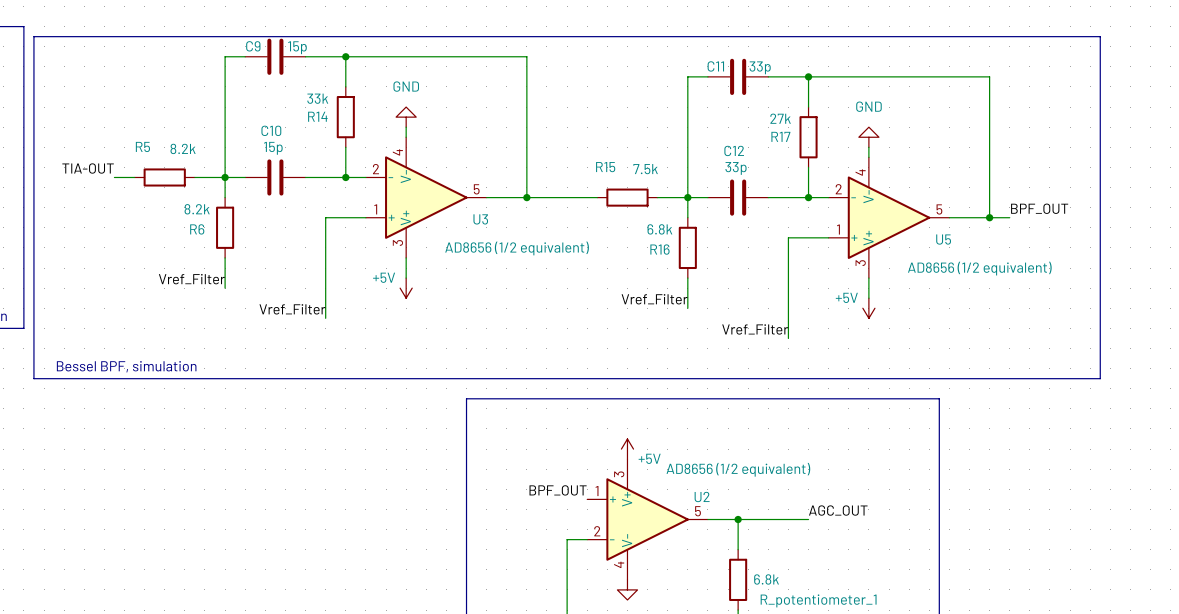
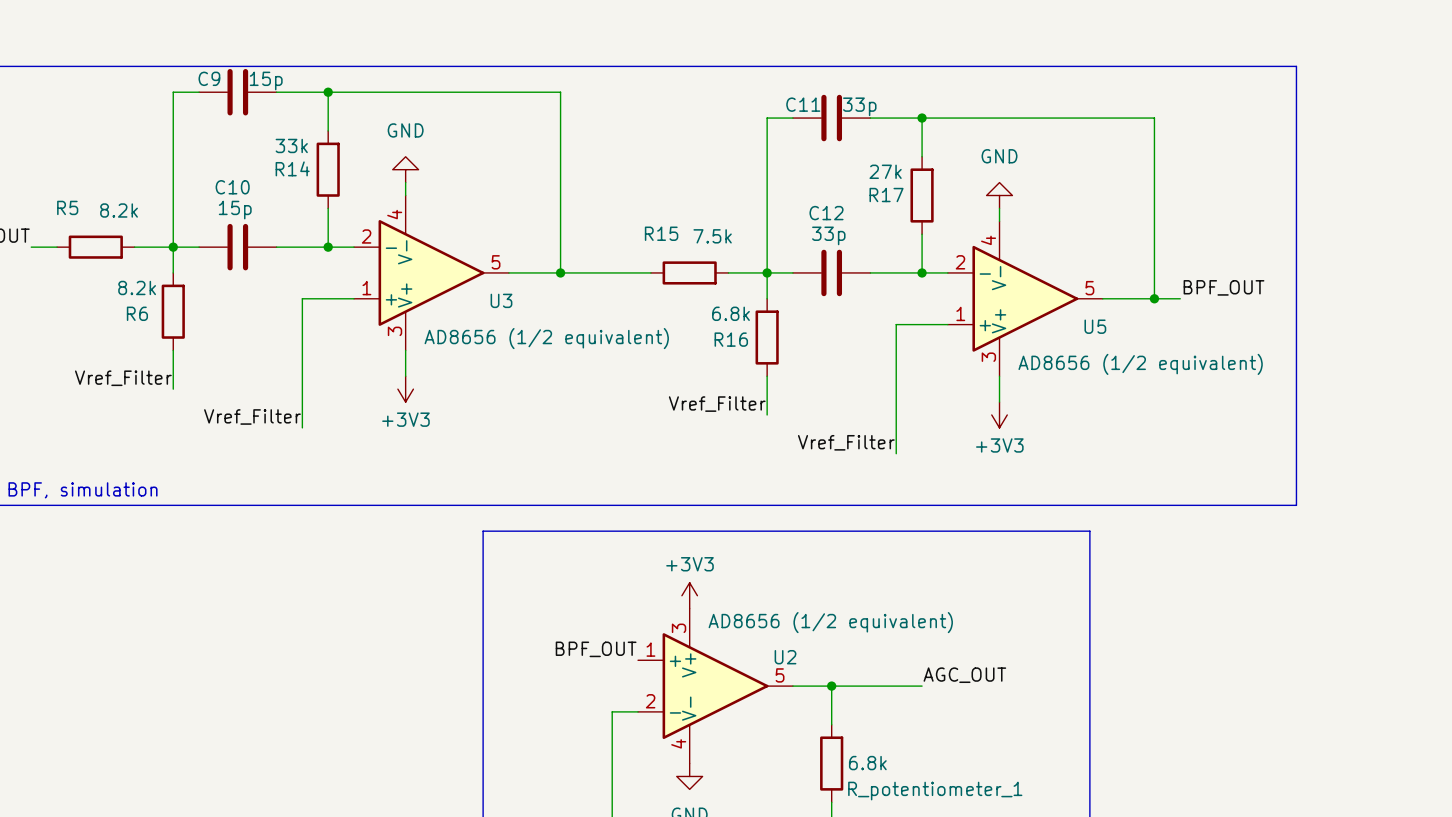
power symbol: +5V (406, 288) -> +3V3 (405, 389)
power symbol: +5V (868, 308) -> +3V3 (999, 414)
power symbol: +5V (627, 449) -> +3V3 (689, 595)

